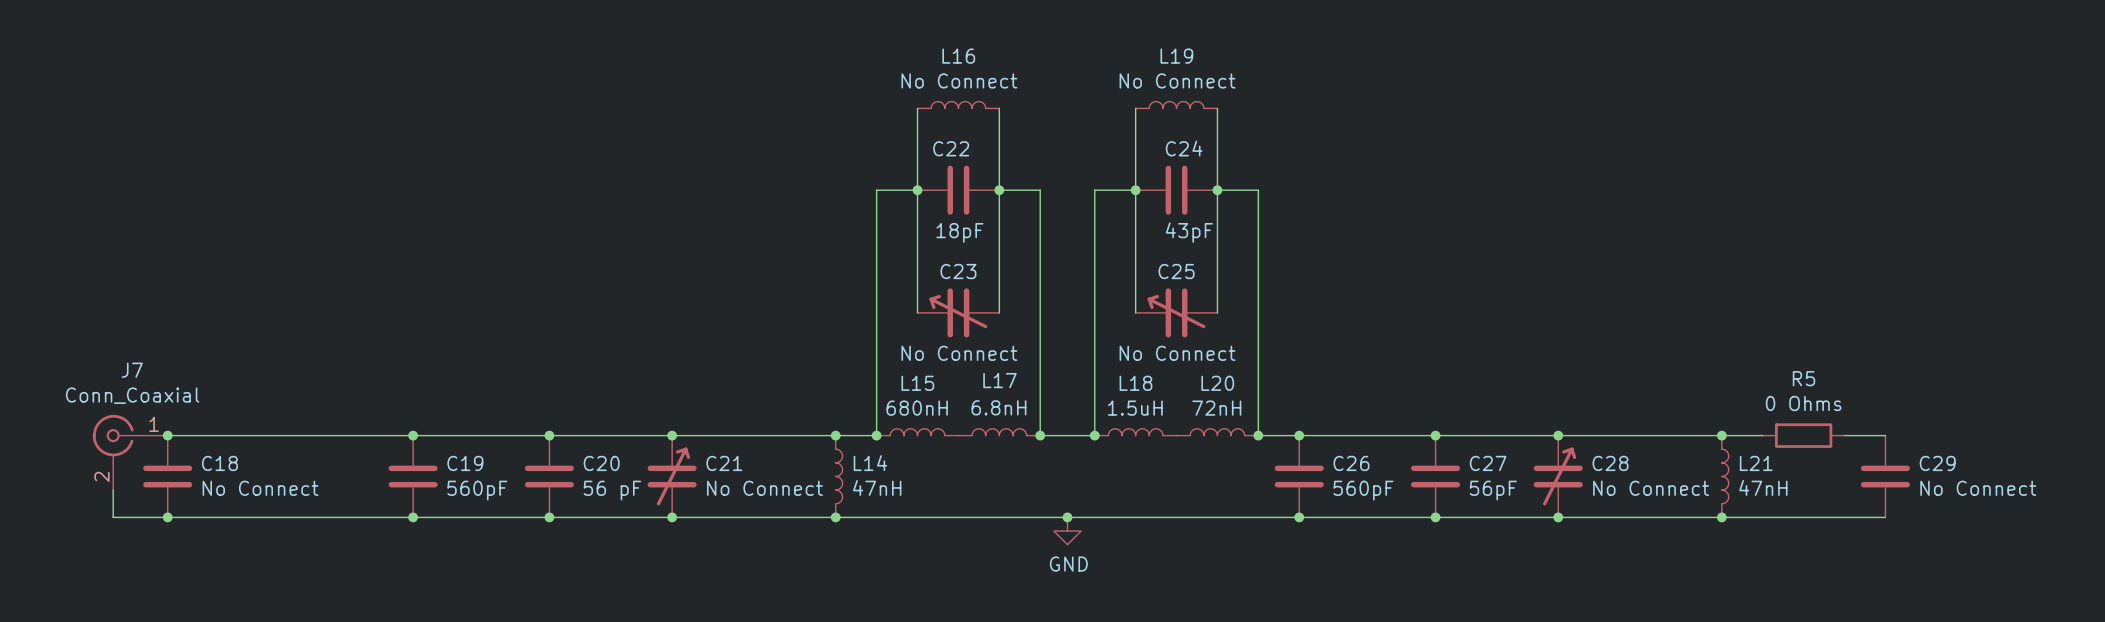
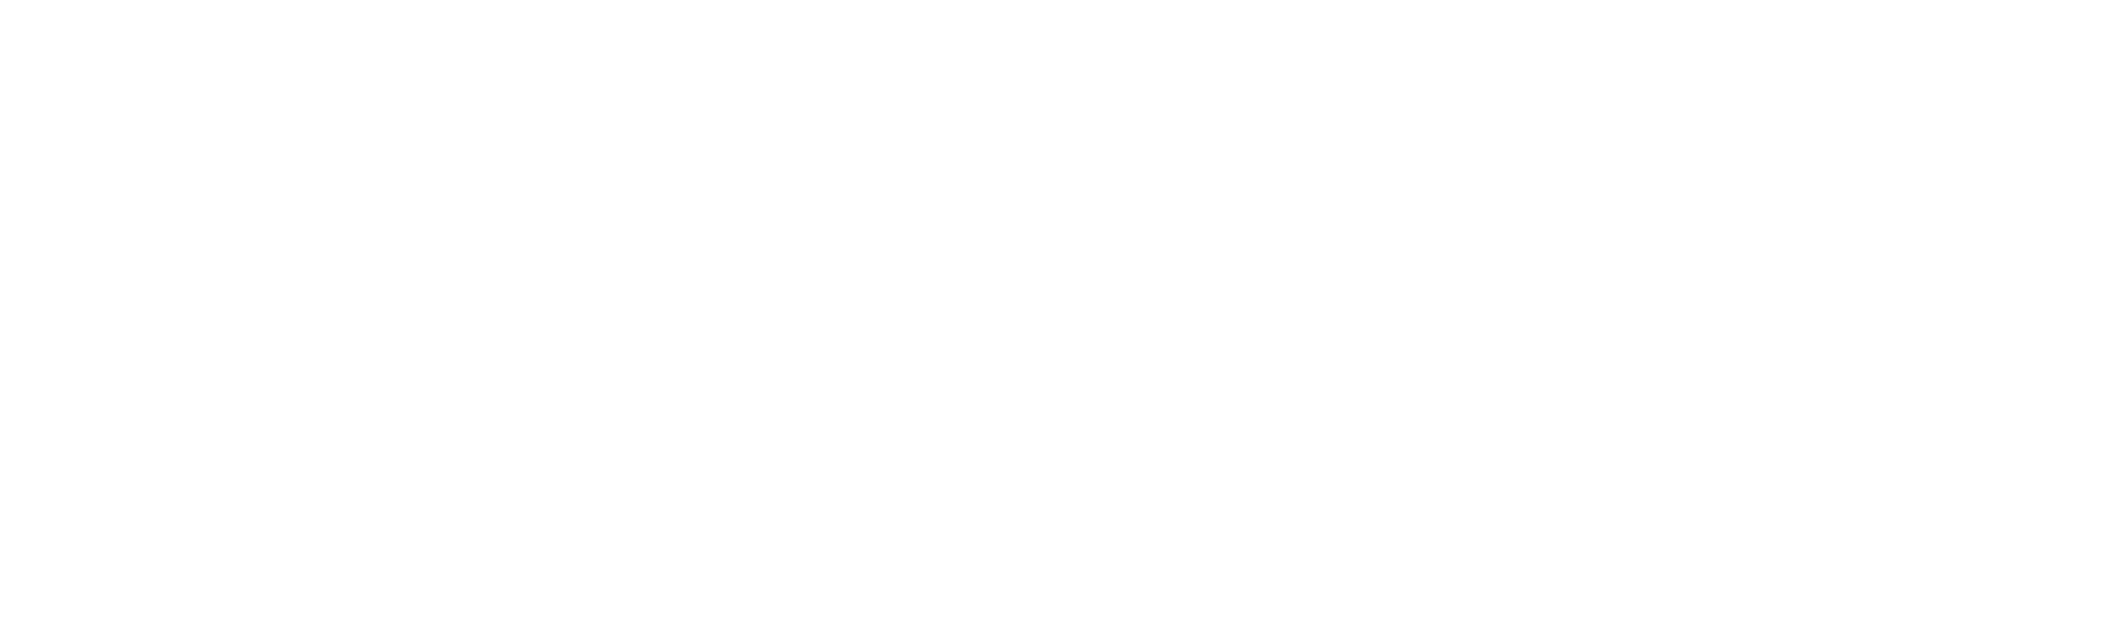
L16: No Connect (958, 105) -> none
L19: No Connect (1176, 105) -> none
wire: (917, 108) (917, 312) -> none
wire: (999, 108) (999, 312) -> none
wire: (1135, 108) (1135, 312) -> none
wire: (1217, 108) (1217, 312) -> none
wire: (917, 190) (876, 190) (876, 435) (167, 435) -> none
junction: (917, 190) -> none
C22: 18pF (958, 190) -> none
wire: (999, 190) (1040, 190) (1040, 435) (1094, 435) (1094, 190) (1135, 190) -> none
junction: (999, 190) -> none
junction: (1135, 190) -> none
C24: 43pF (1176, 190) -> none
wire: (1217, 190) (1258, 190) (1258, 435) (1762, 435) -> none
junction: (1217, 190) -> none
C23: No Connect (958, 312) -> none
C25: No Connect (1176, 312) -> none
L15: 680nH (917, 432) -> none
L17: 6.8nH (999, 432) -> none
L18: 1.5uH (1135, 432) -> none
L20: 72nH (1217, 432) -> none
junction: (167, 435) -> none
junction: (413, 435) -> none
junction: (549, 435) -> none
junction: (672, 435) -> none
junction: (835, 435) -> none
junction: (876, 435) -> none
junction: (1040, 435) -> none
junction: (1094, 435) -> none
junction: (1258, 435) -> none
junction: (1299, 435) -> none
junction: (1435, 435) -> none
junction: (1558, 435) -> none
junction: (1721, 435) -> none
R5: 0 Ohms (1803, 435) -> none
wire: (1844, 435) (1885, 435) -> none
J7: Conn_Coaxial (130, 452) -> none
C18: No Connect (167, 476) -> none
C19: 560pF (413, 476) -> none
C20: 56 pF (549, 476) -> none
C21: No Connect (672, 476) -> none
L14: 47nH (839, 476) -> none
C26: 560pF (1299, 476) -> none
C27: 56pF (1435, 476) -> none
C28: No Connect (1558, 476) -> none
L21: 47nH (1725, 476) -> none
C29: No Connect (1885, 476) -> none
wire: (113, 490) (113, 517) (1885, 517) -> none
junction: (167, 517) -> none
junction: (413, 517) -> none
junction: (549, 517) -> none
junction: (672, 517) -> none
junction: (835, 517) -> none
junction: (1067, 517) -> none
junction: (1299, 517) -> none
junction: (1435, 517) -> none
junction: (1558, 517) -> none
junction: (1721, 517) -> none
power symbol: GND (1067, 531) -> none

